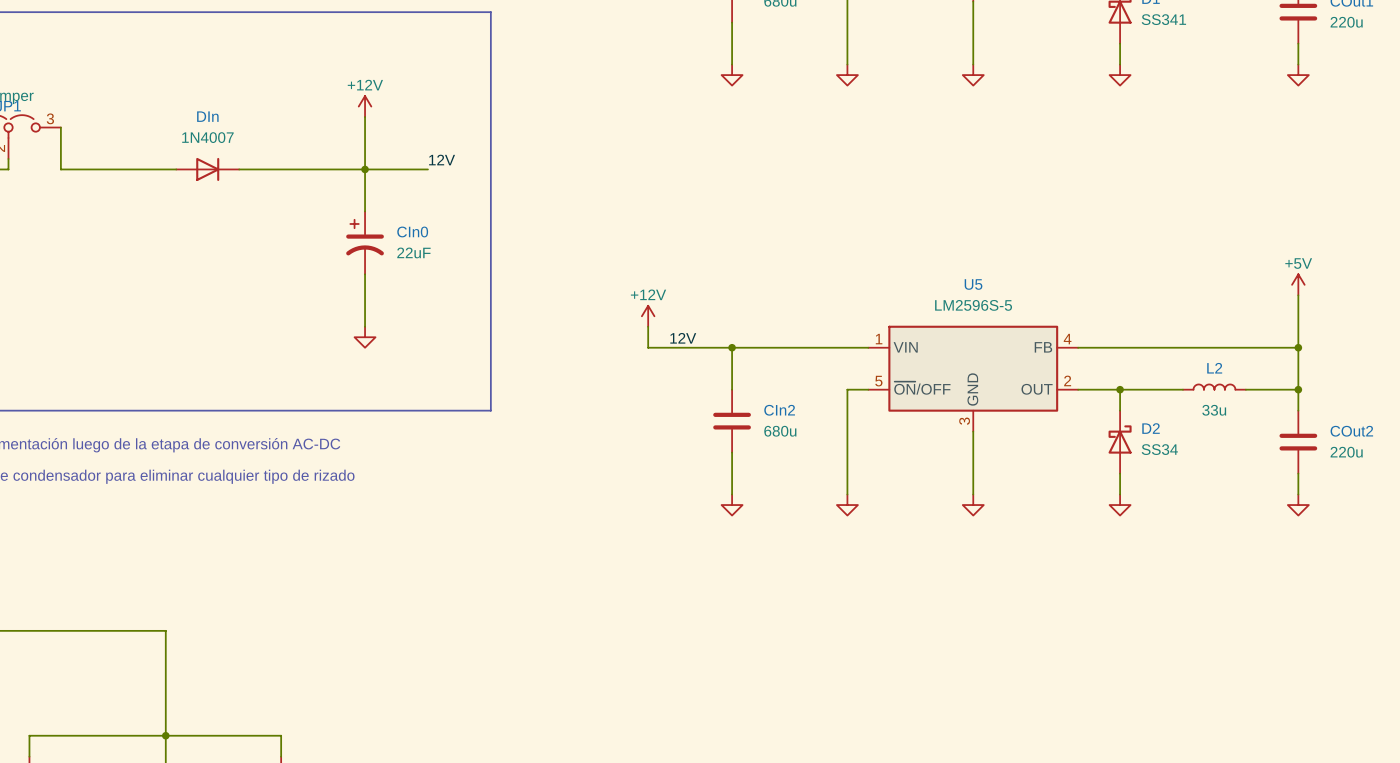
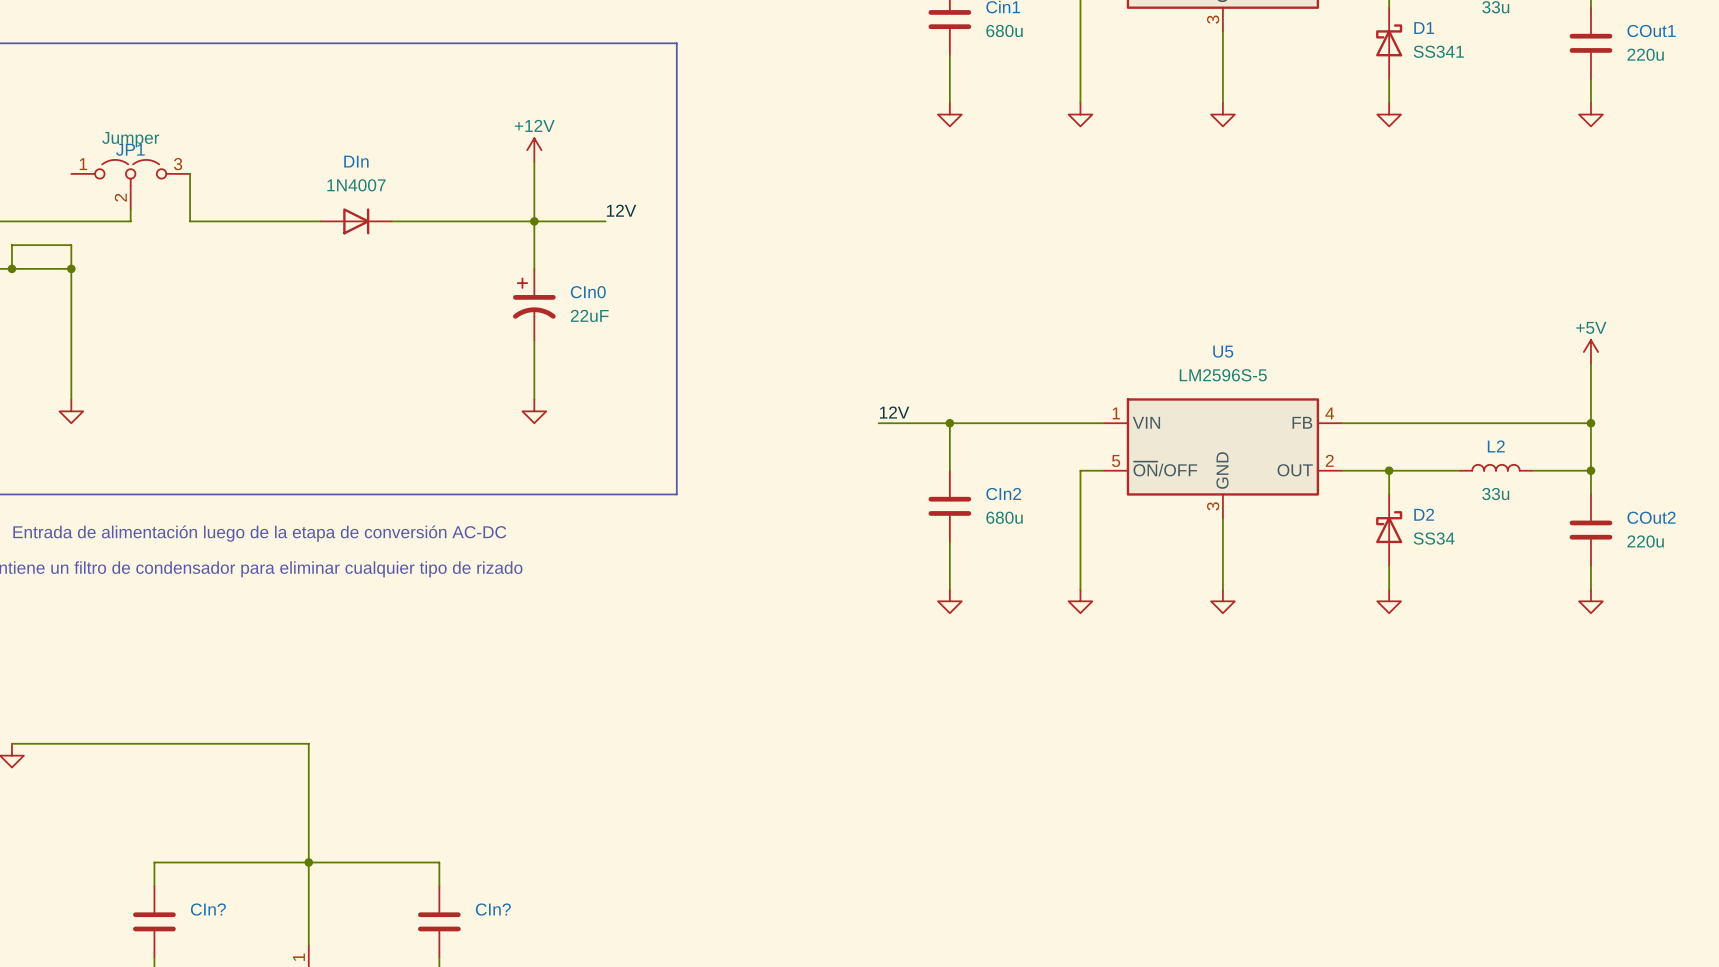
power symbol: +12V (648, 316) -> none
wire: (648, 326) (648, 347) (669, 347) -> none

